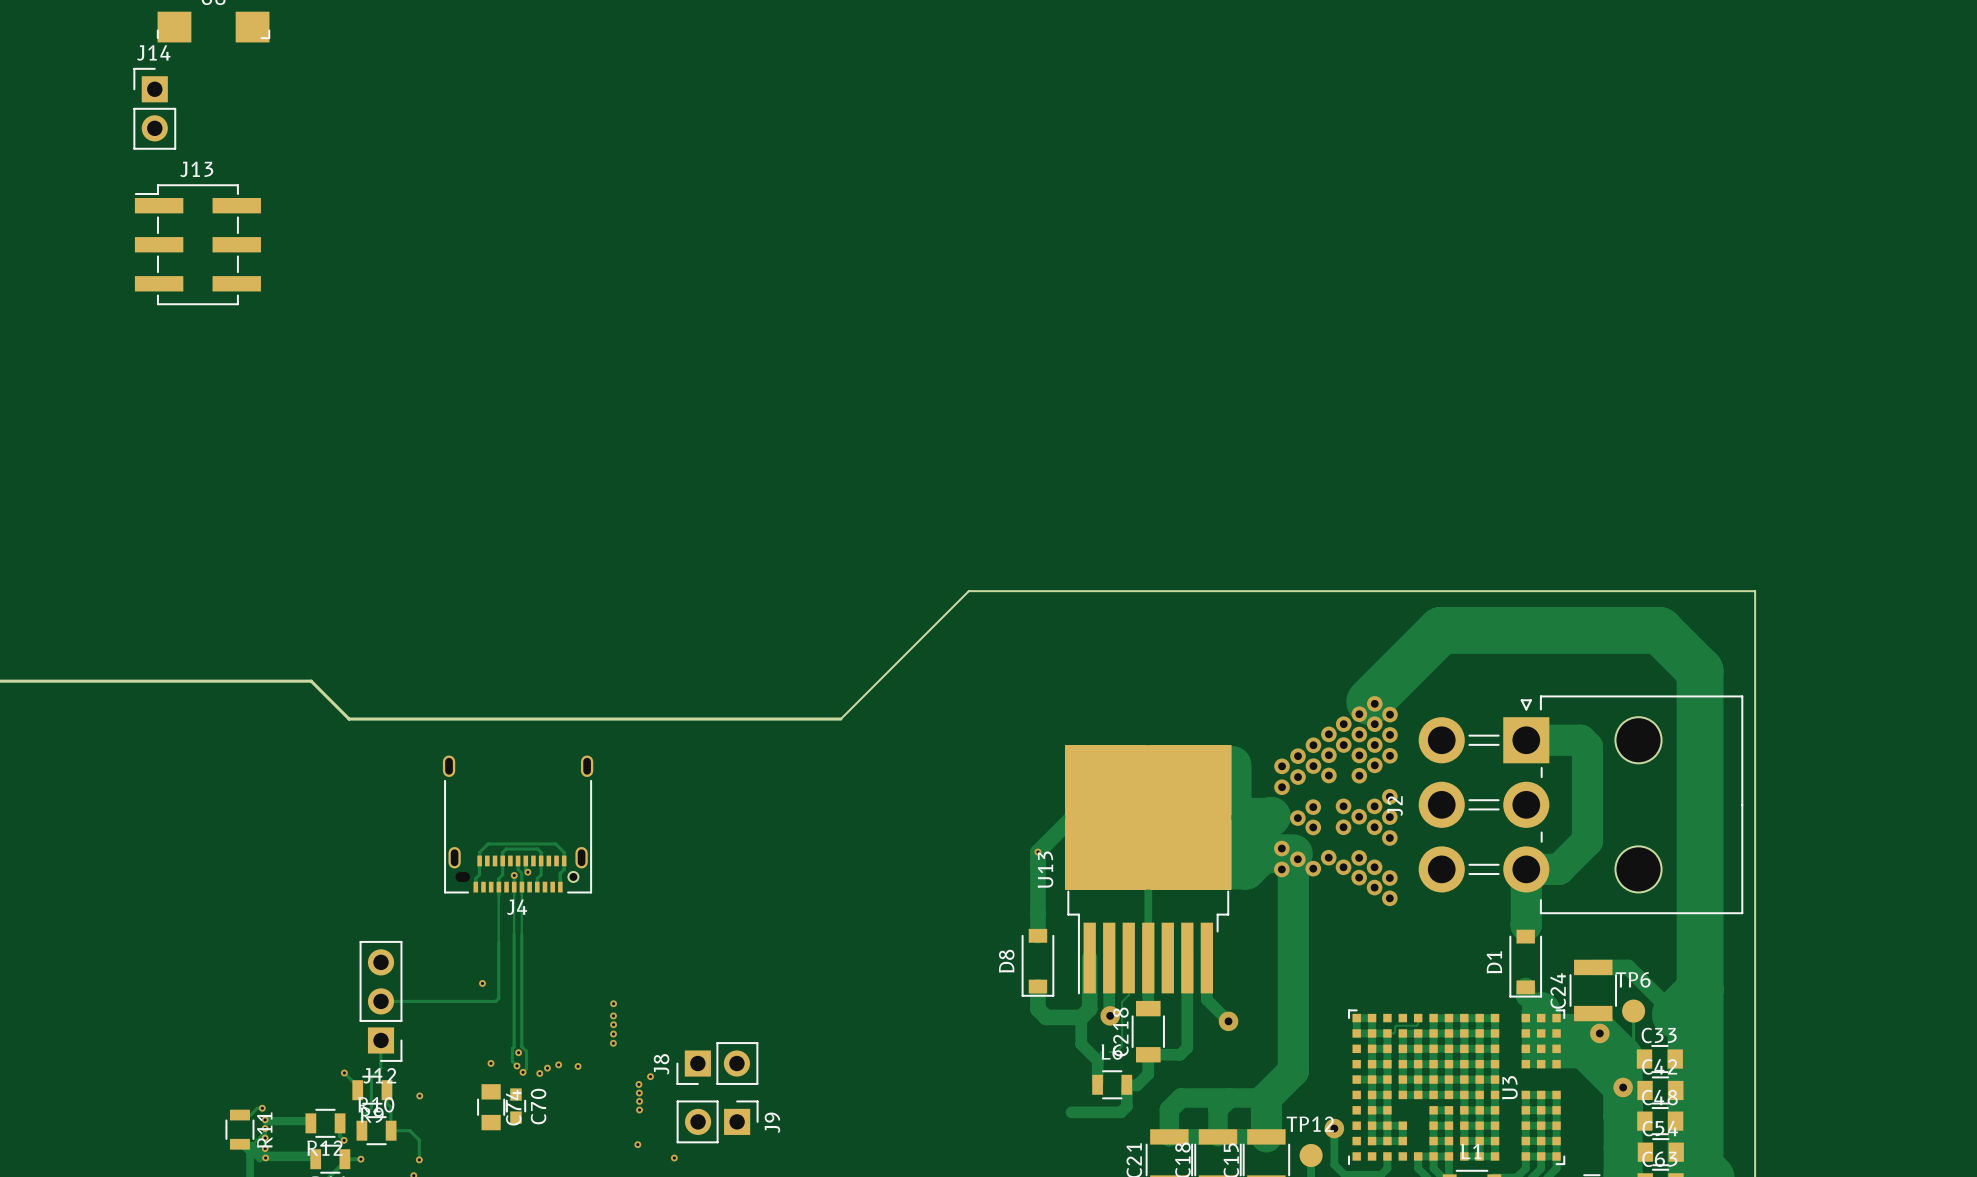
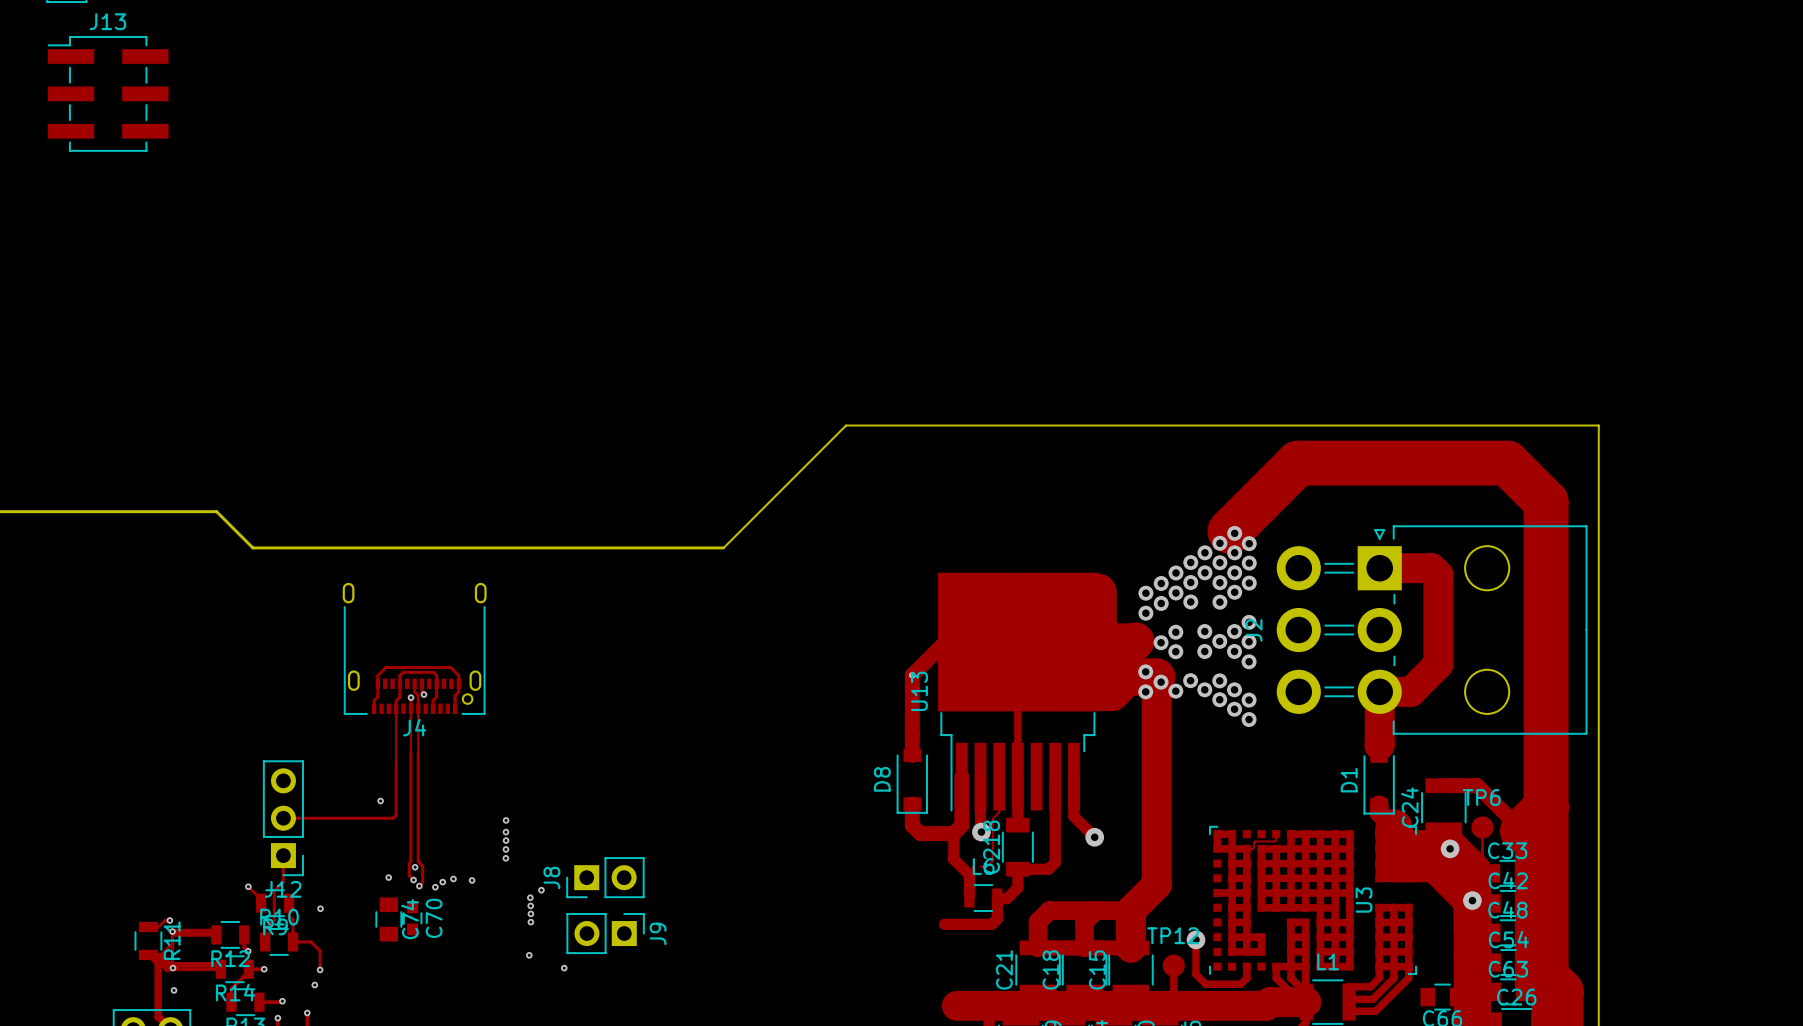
via: (265, 1128) -> none
via: (265, 1138) -> none
via: (265, 1148) -> none

